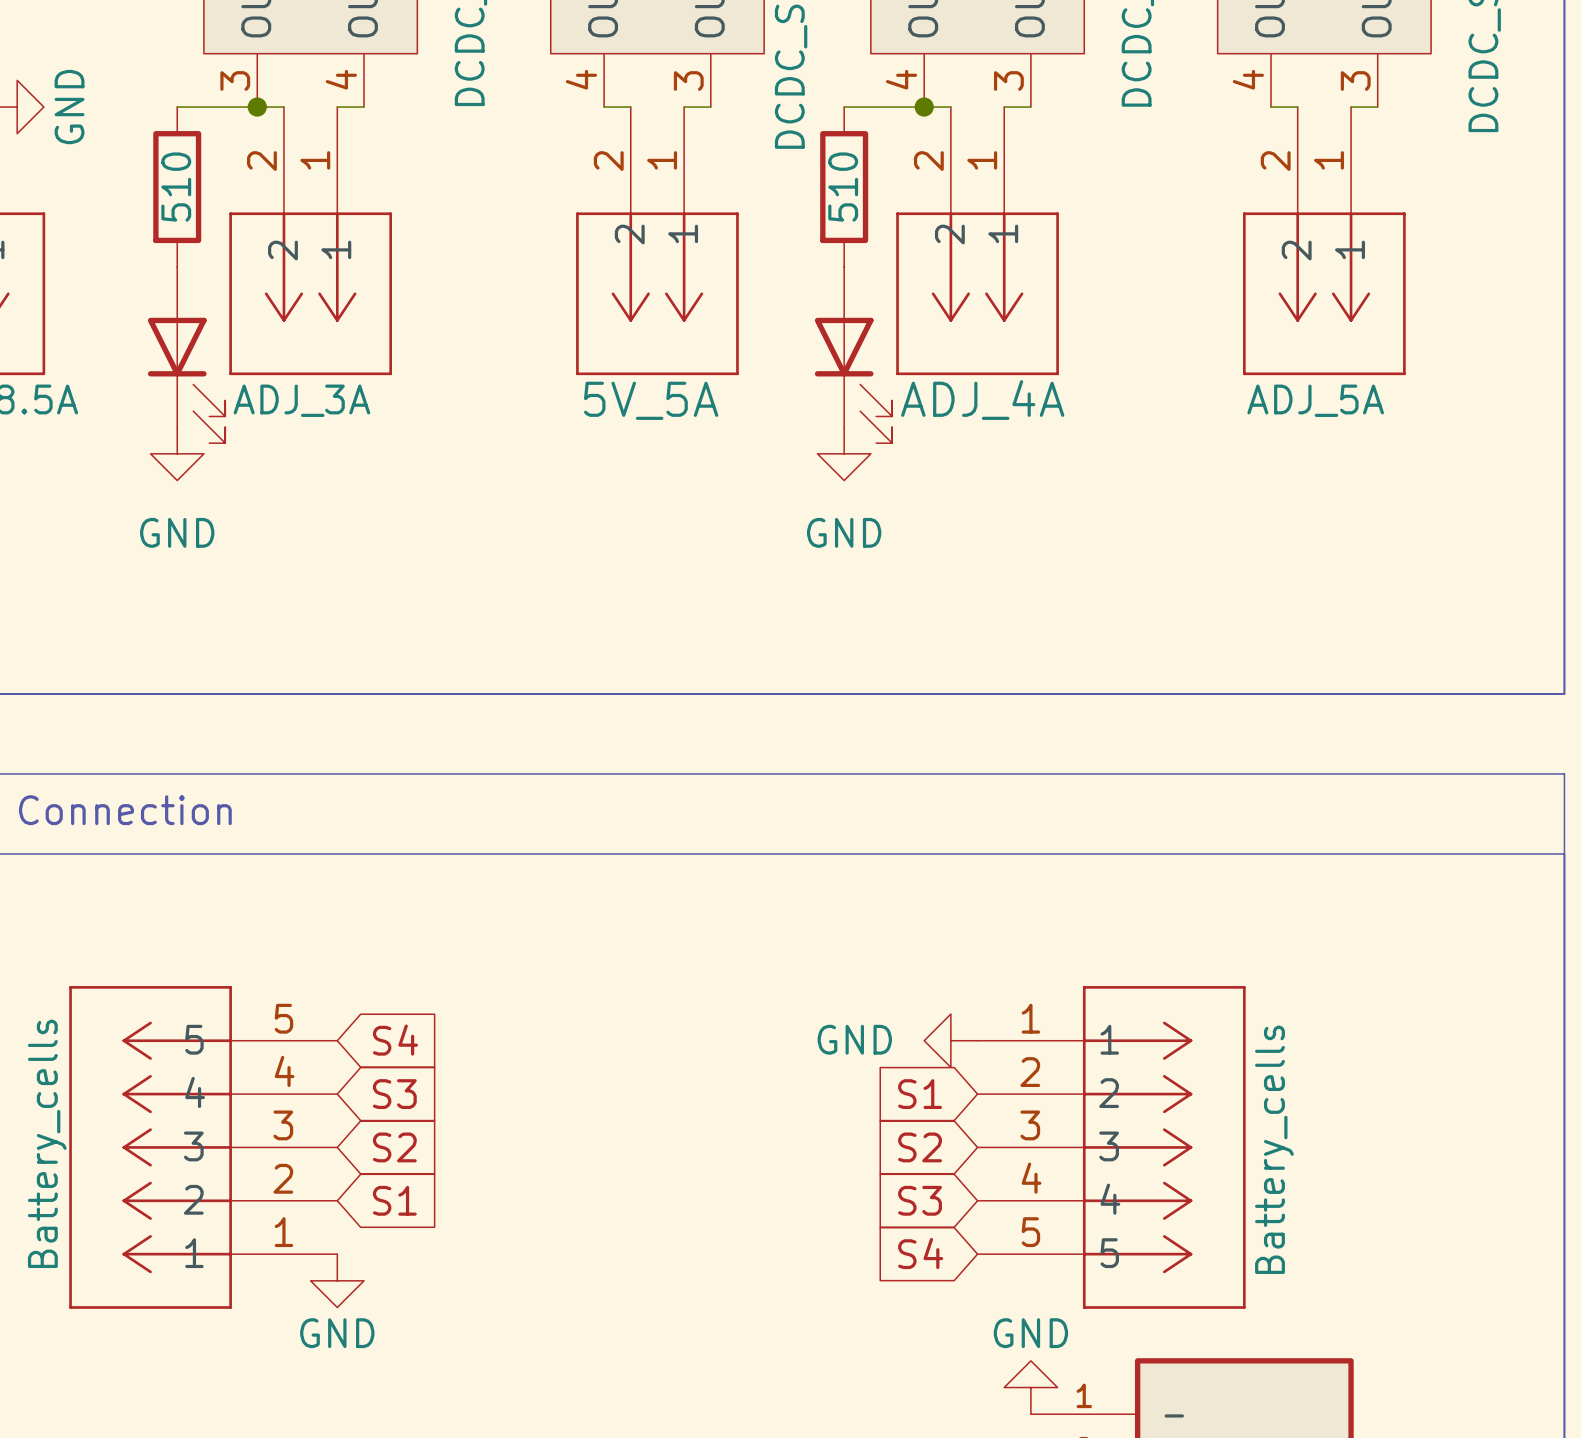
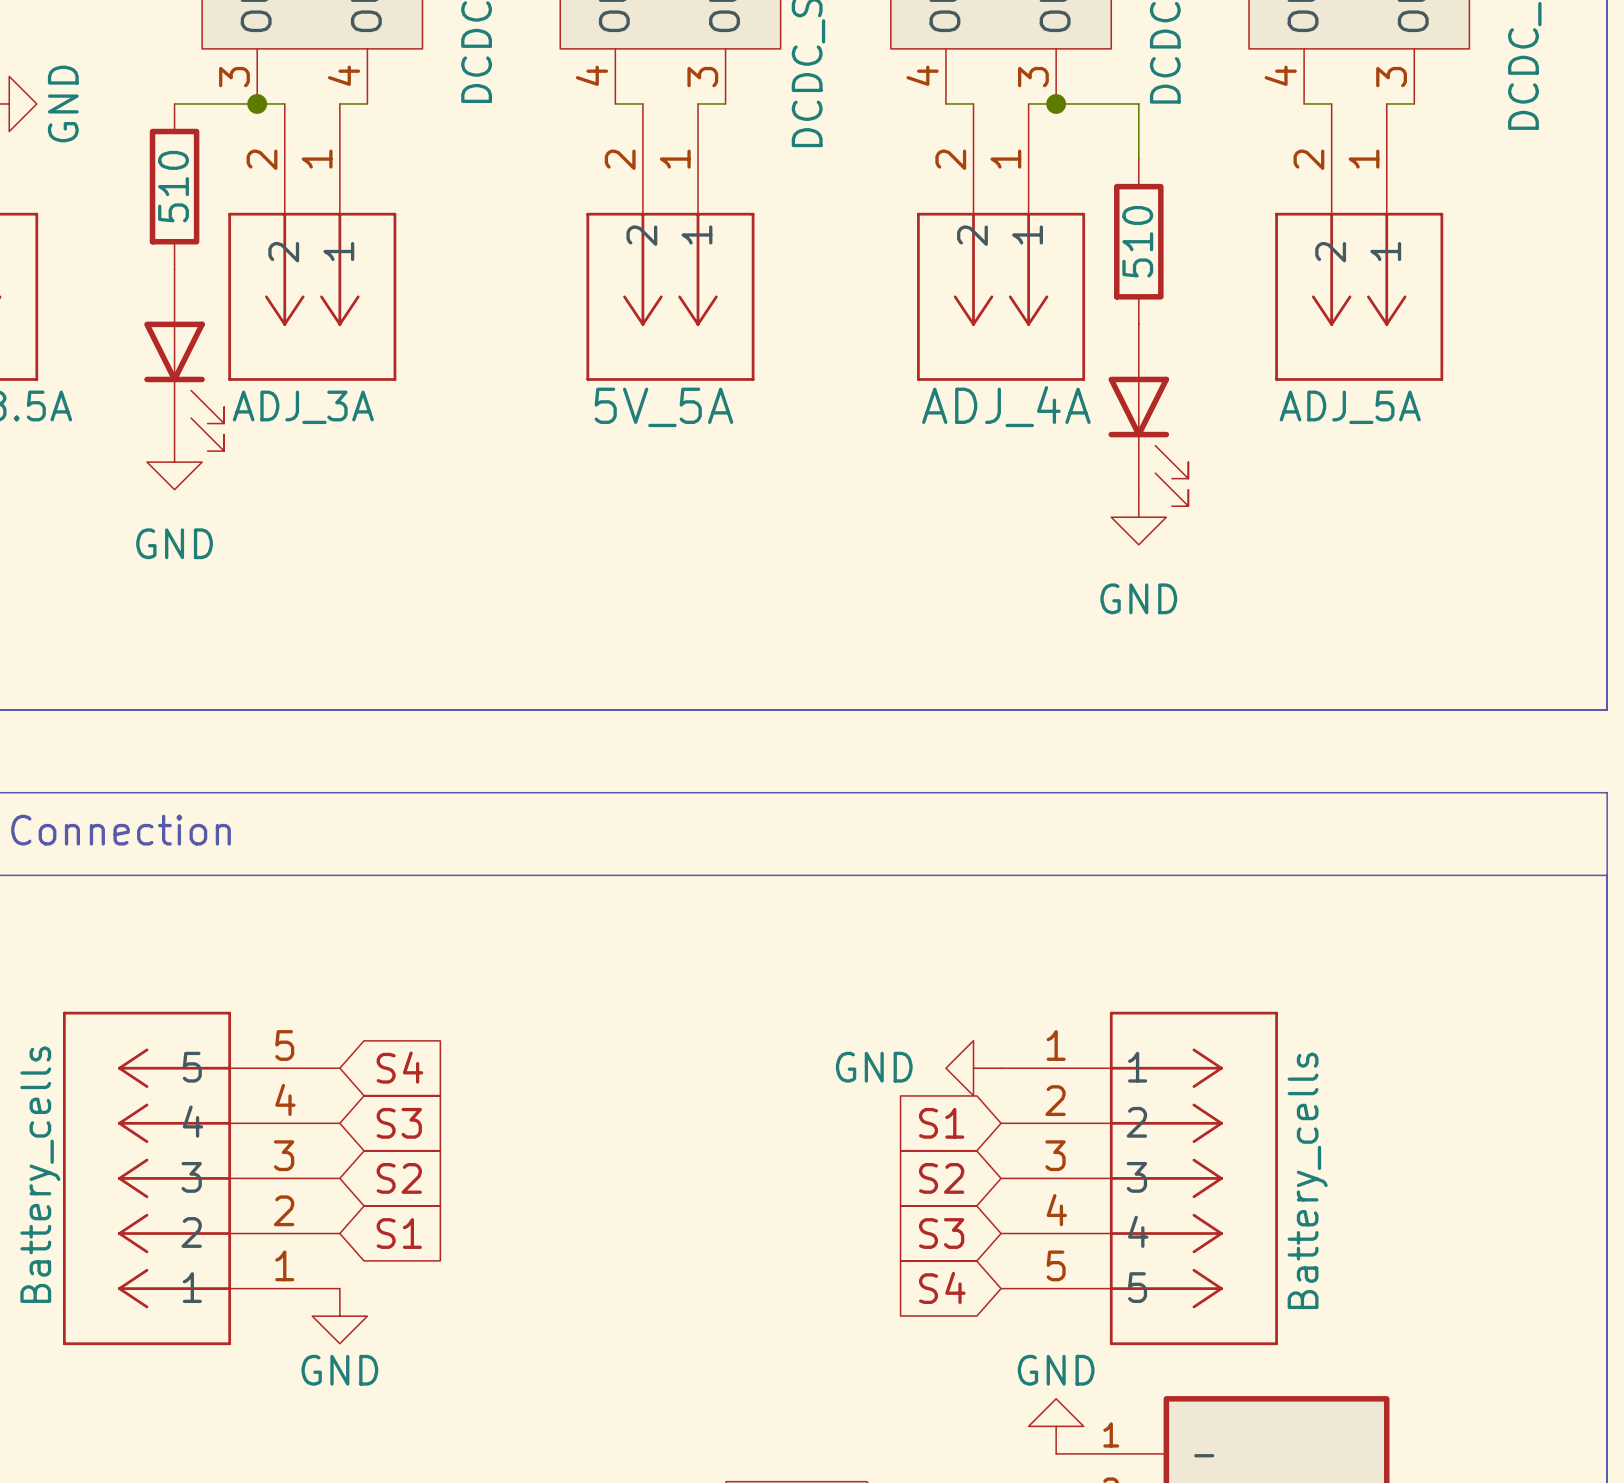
wire: (844, 107) (924, 107) -> none
junction position: (924, 107) -> (1056, 103)
wire: none -> (1056, 103) (1138, 103) (1138, 159)
part position: (844, 187) -> (1138, 241)
part position: (853, 355) -> (1148, 415)
power symbol position: GND (844, 453) -> GND (1138, 517)

